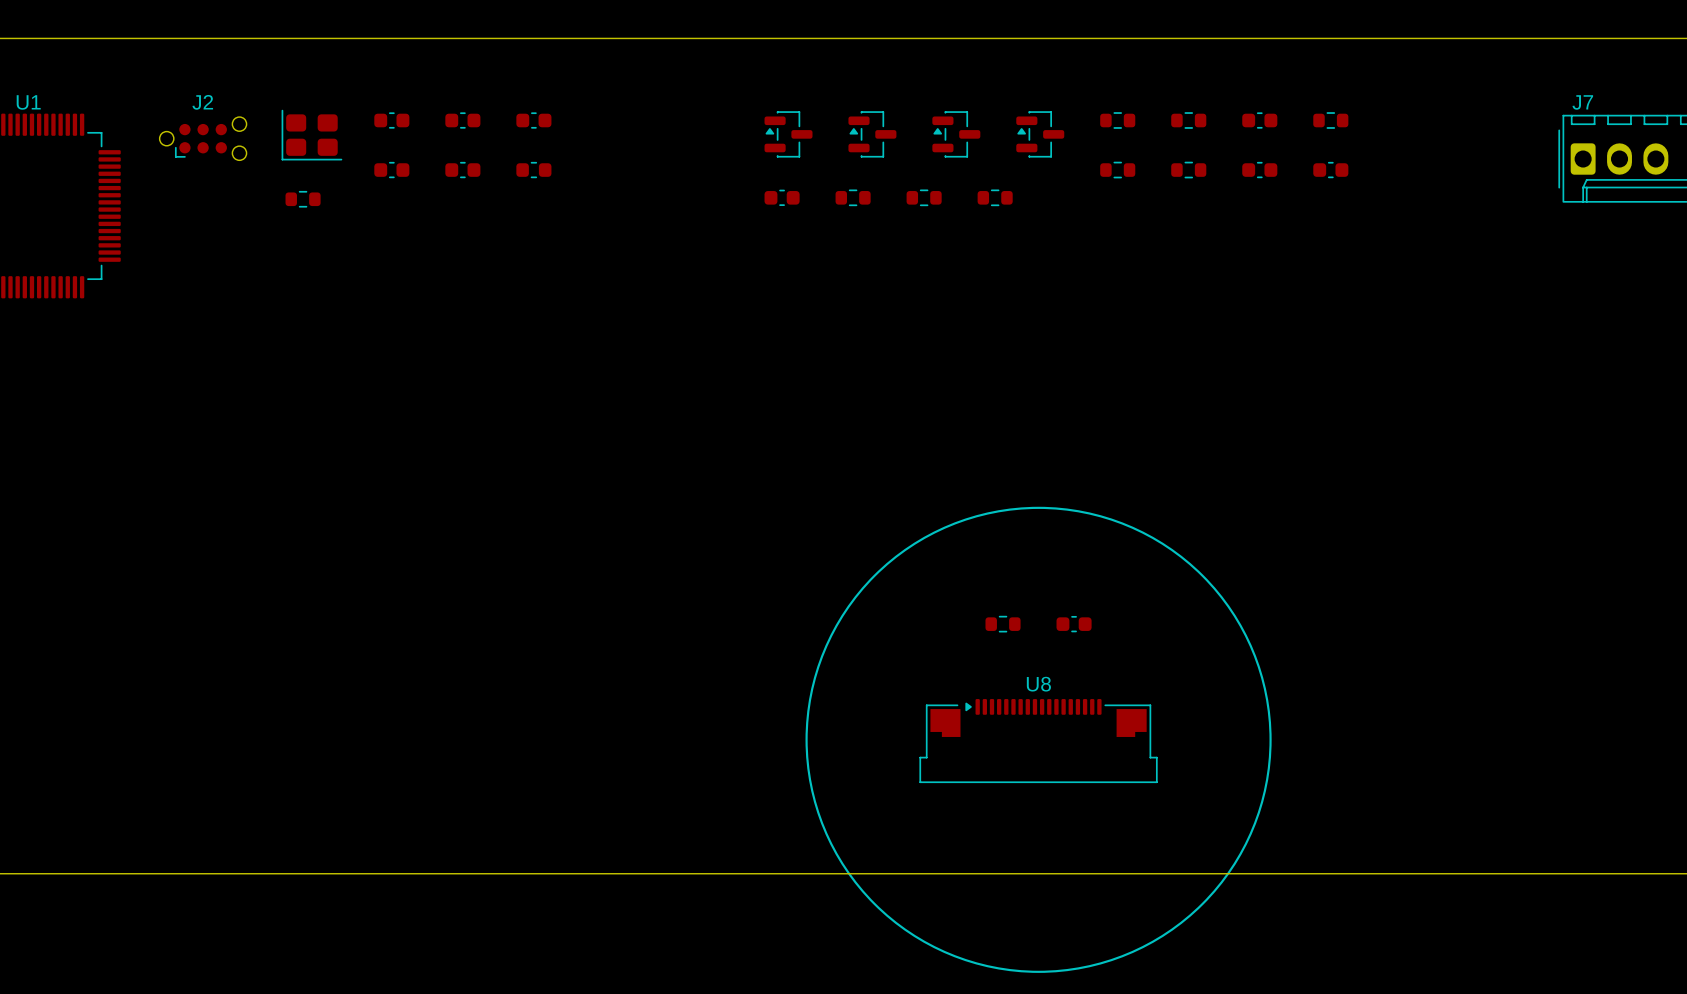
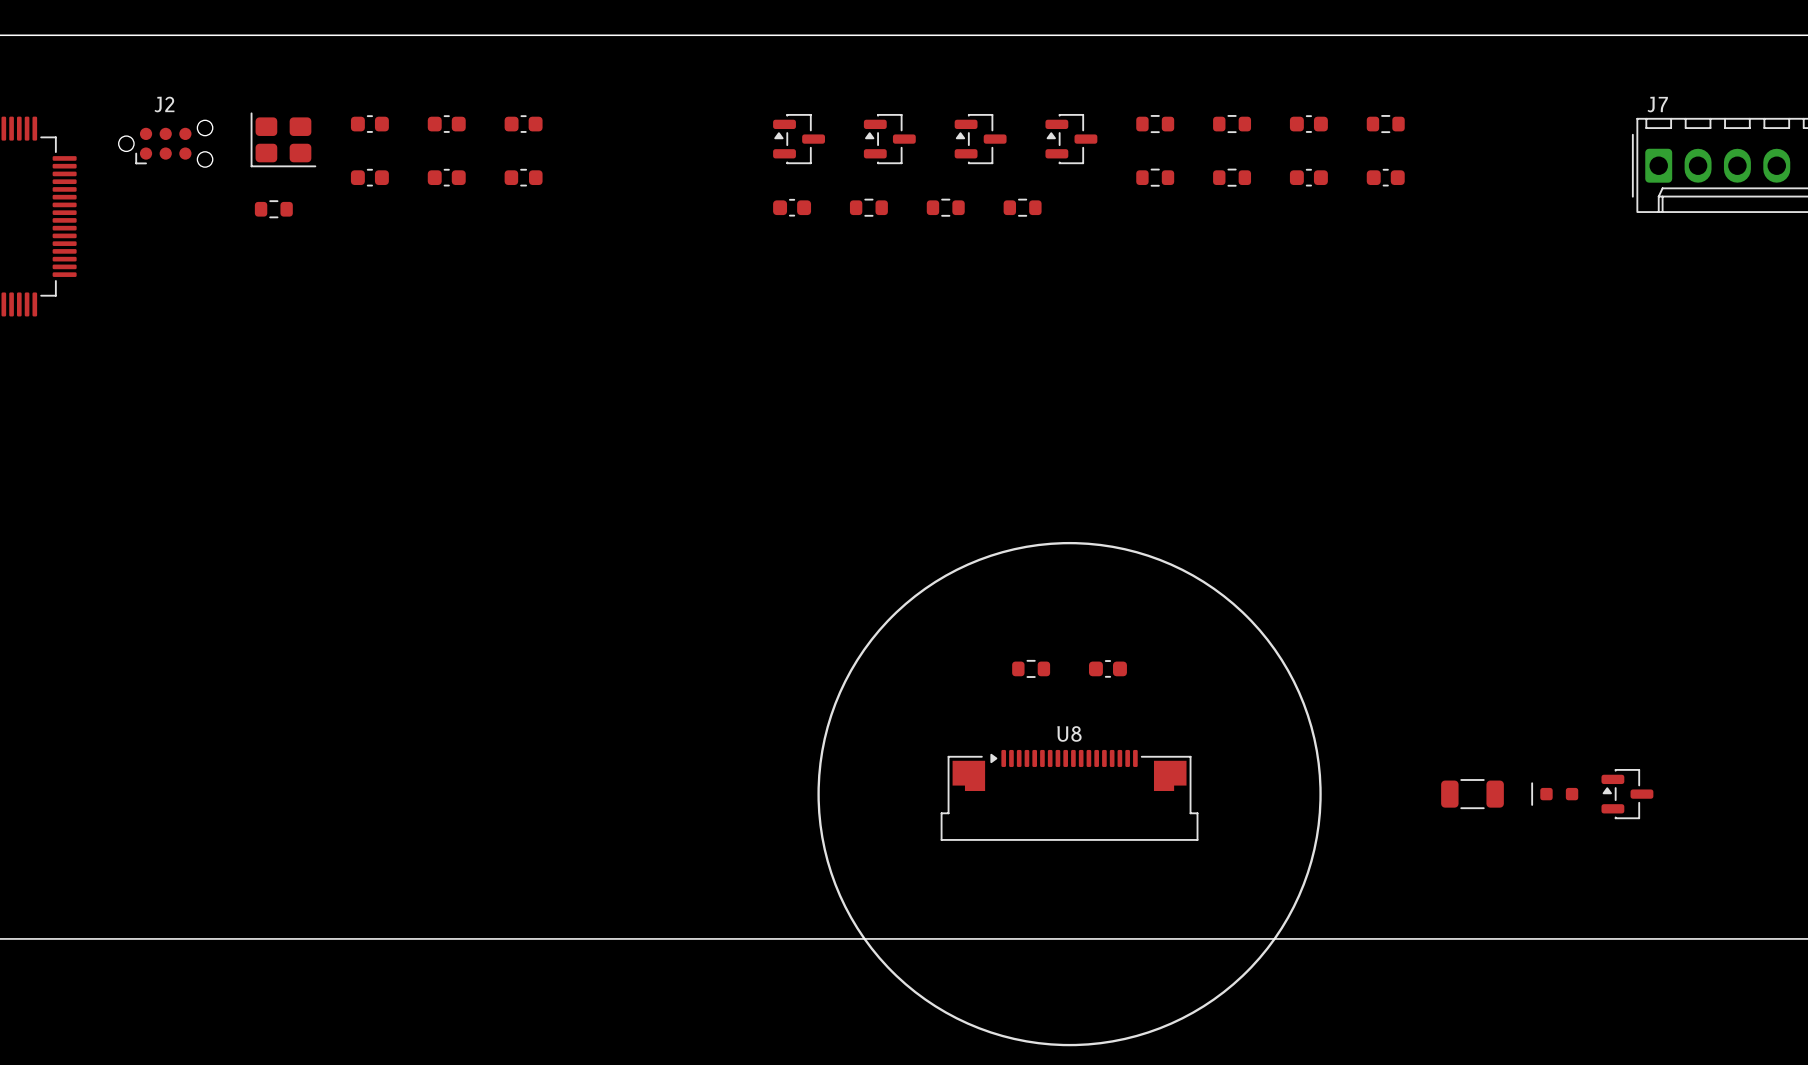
part: none -> (1472, 794)
part: none -> (1554, 794)
part: none -> (1627, 794)

